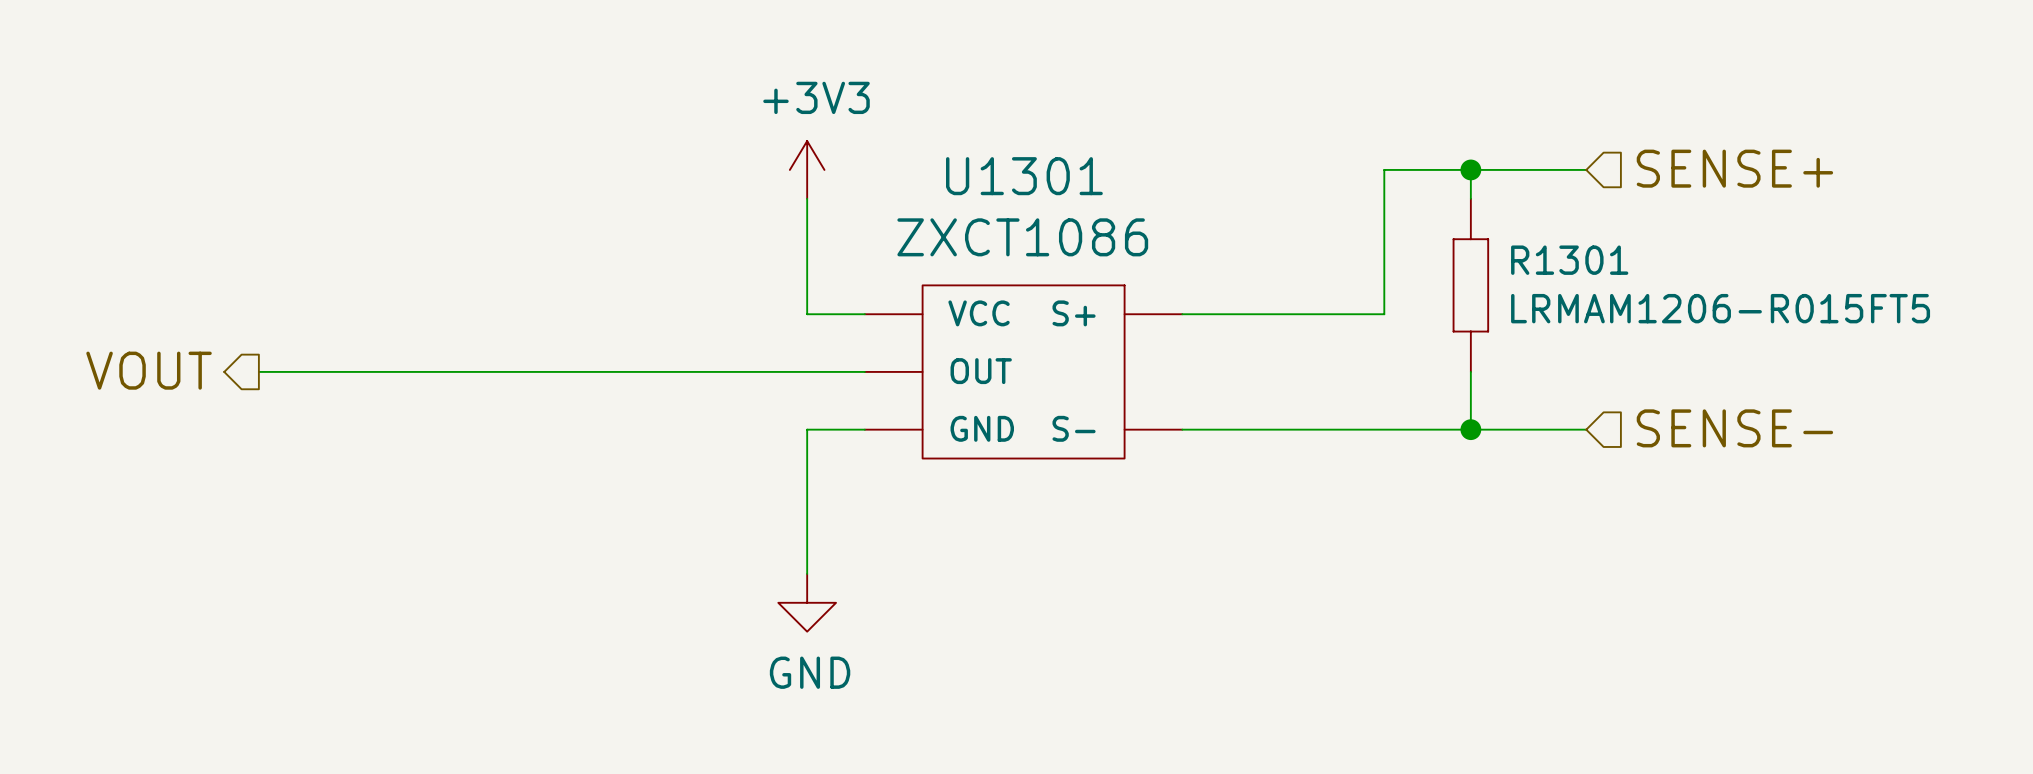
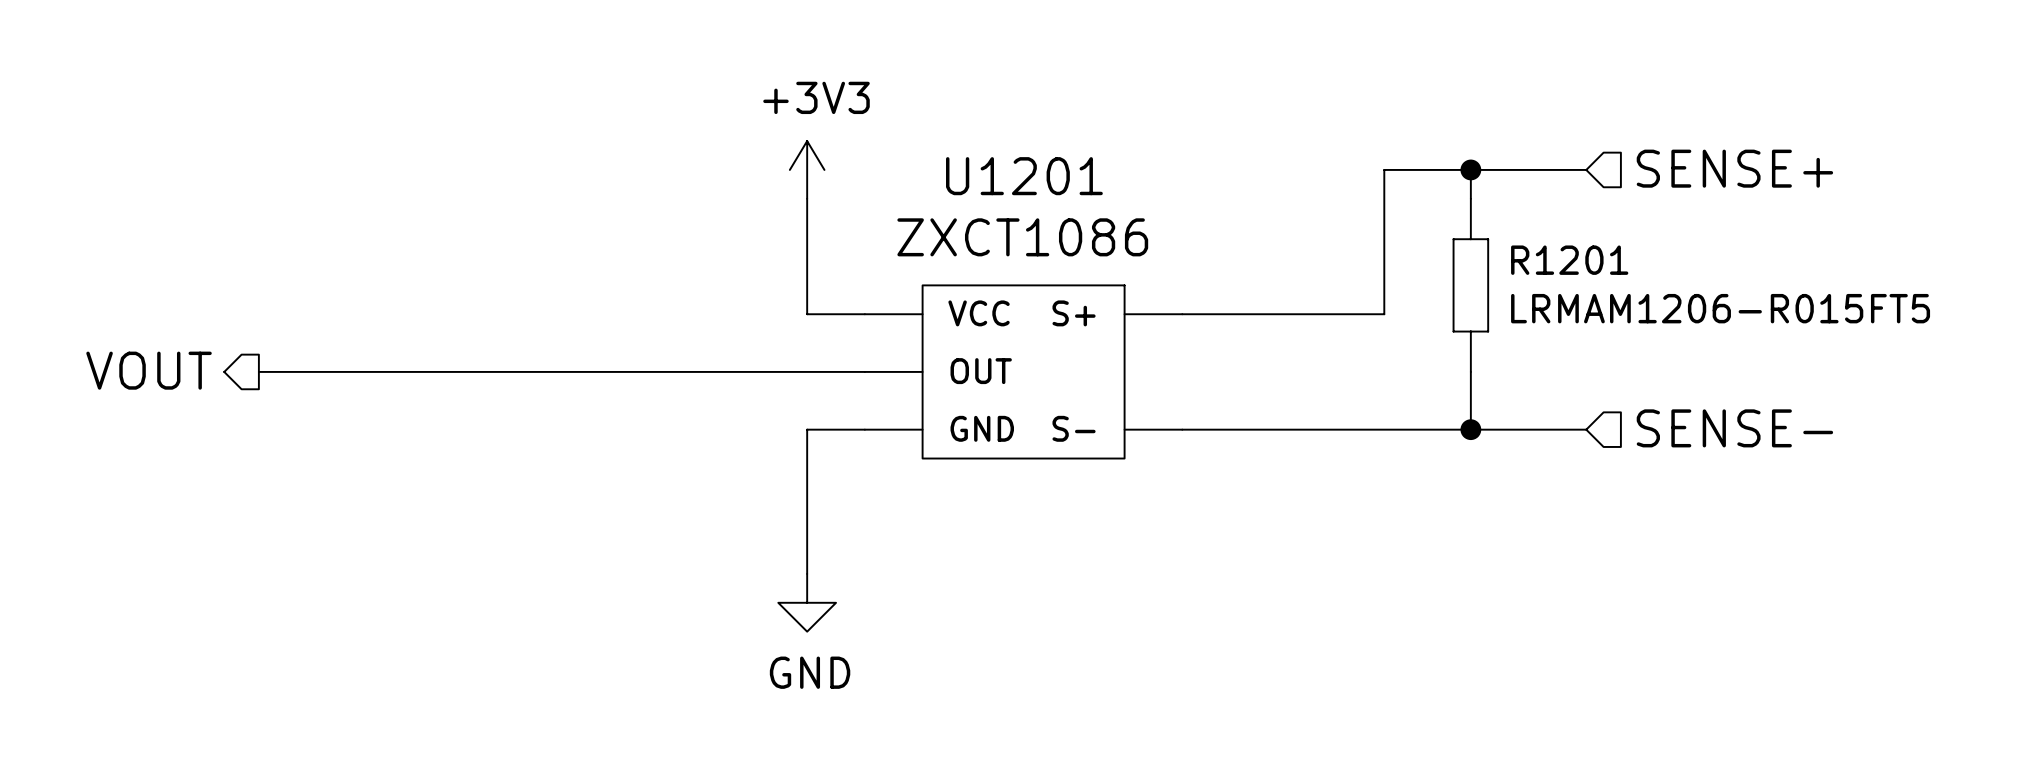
U1301 name: U1301 (1024, 176) -> U1201 (1024, 176)
R1301 name: R1301 (1569, 260) -> R1201 (1569, 260)

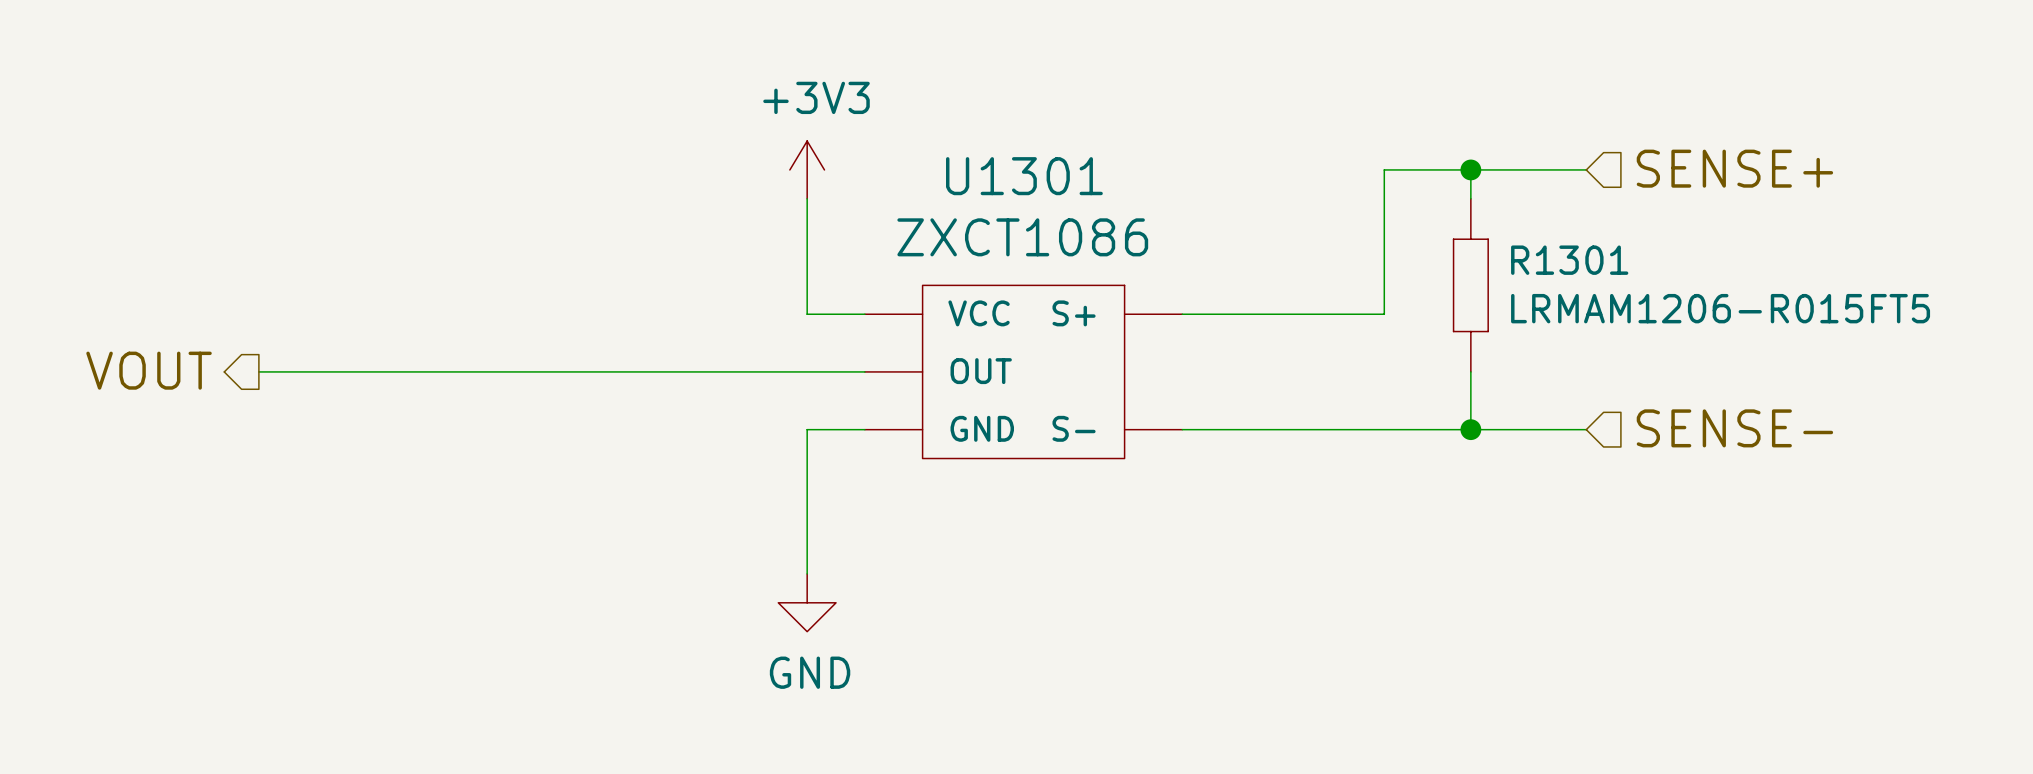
U1201 name: U1201 (1024, 176) -> U1301 (1024, 176)
R1201 name: R1201 (1569, 260) -> R1301 (1569, 260)

